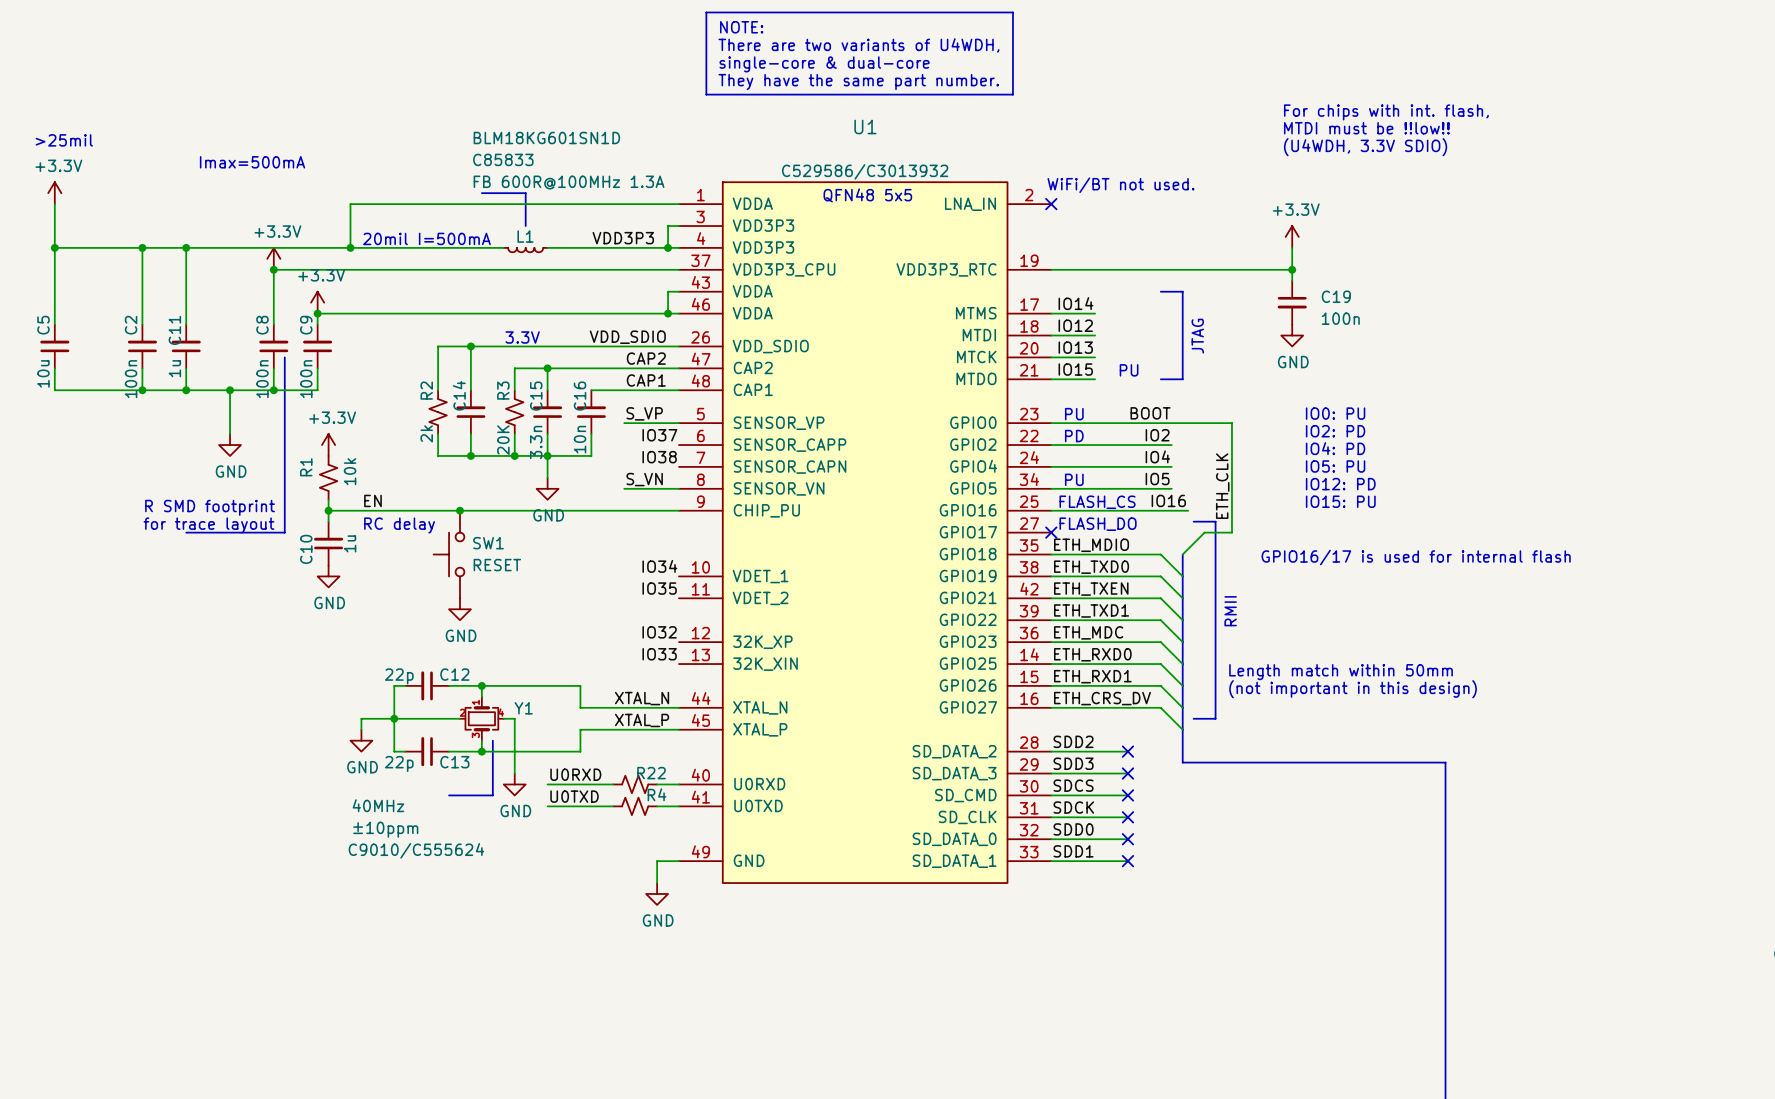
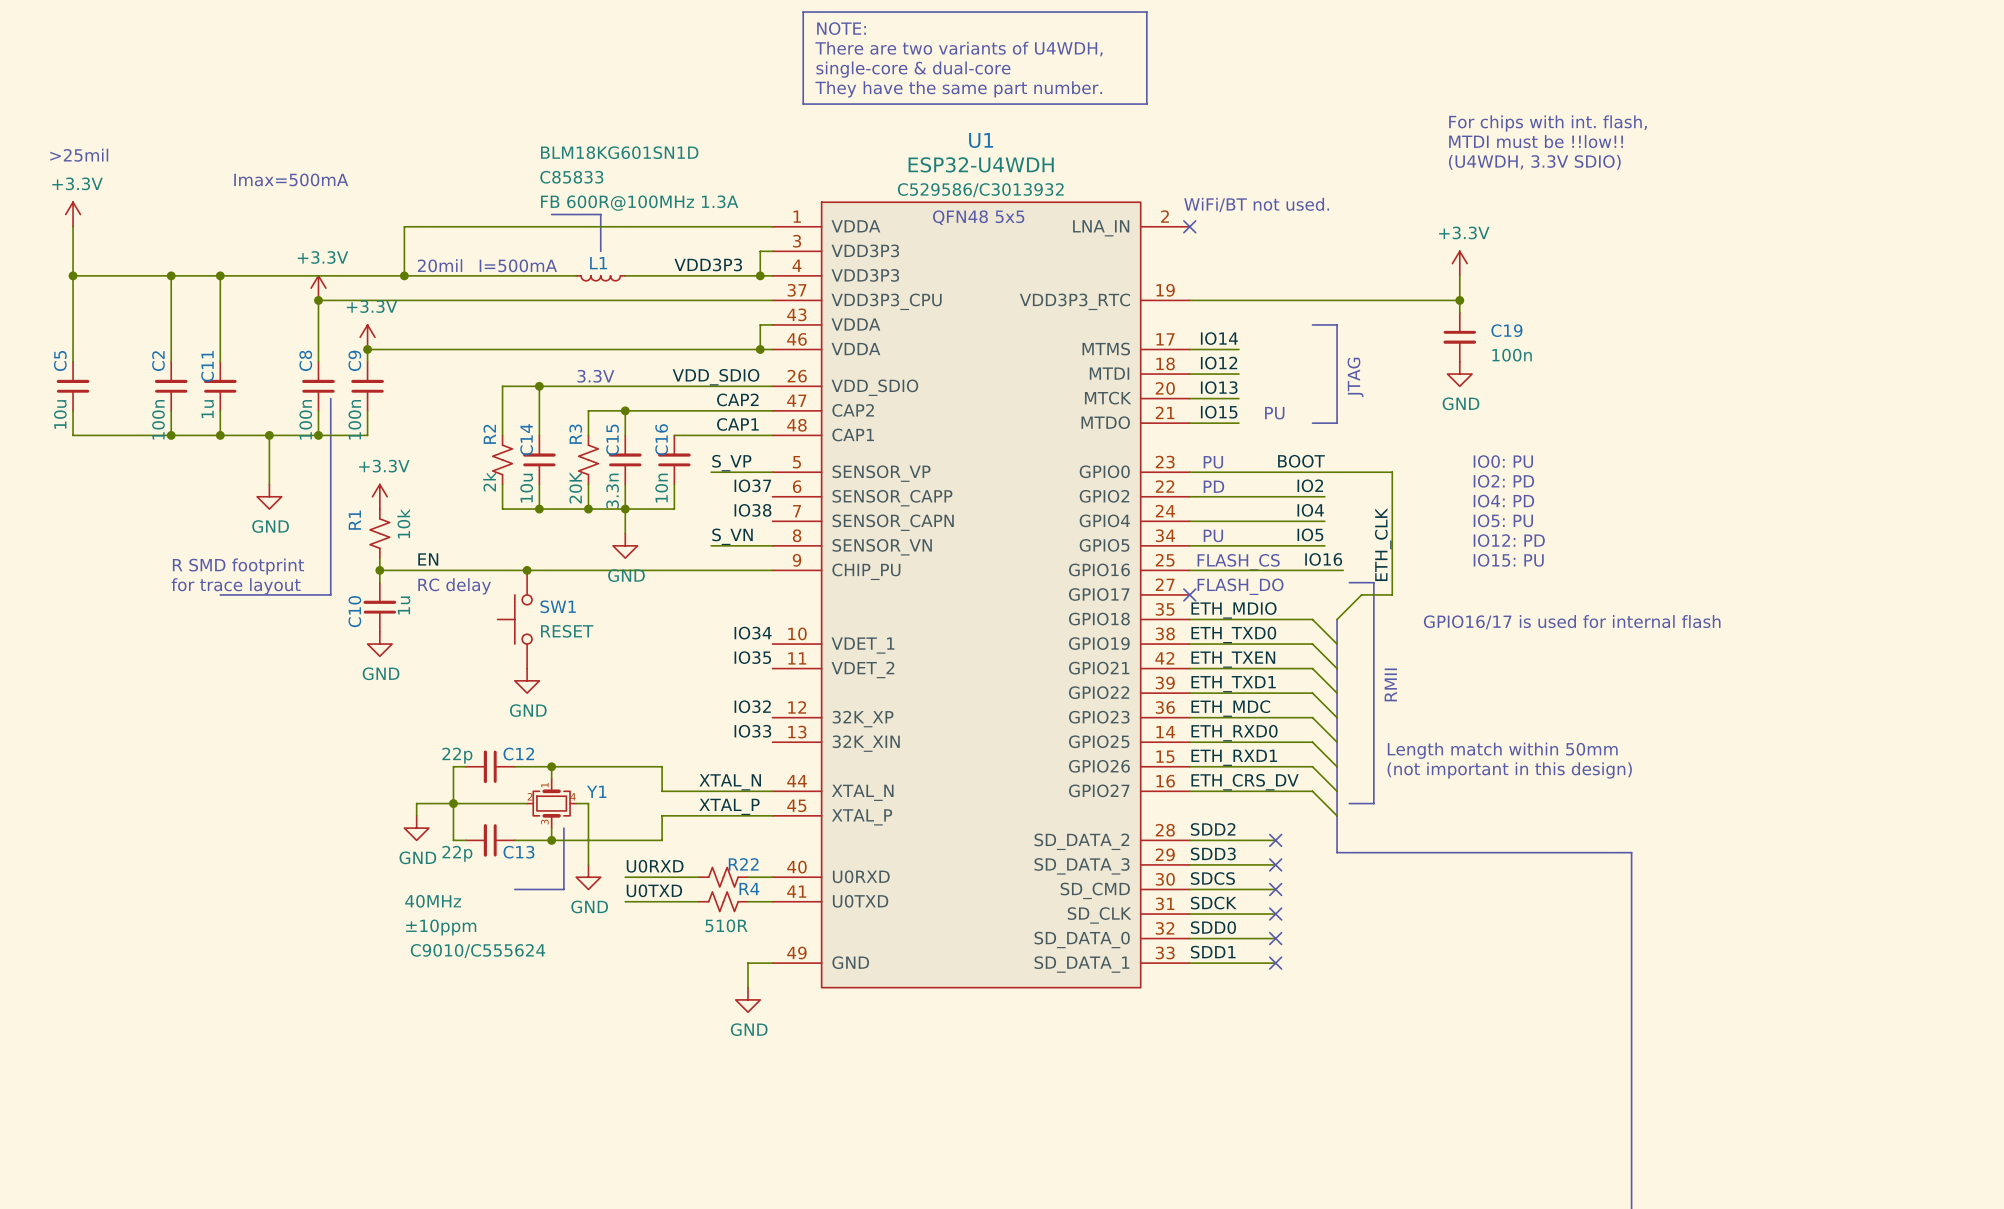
U1 value: none -> ESP32-U4WDH (981, 164)
C14 value: none -> 10u (526, 488)
R4 value: none -> 510R (726, 925)

